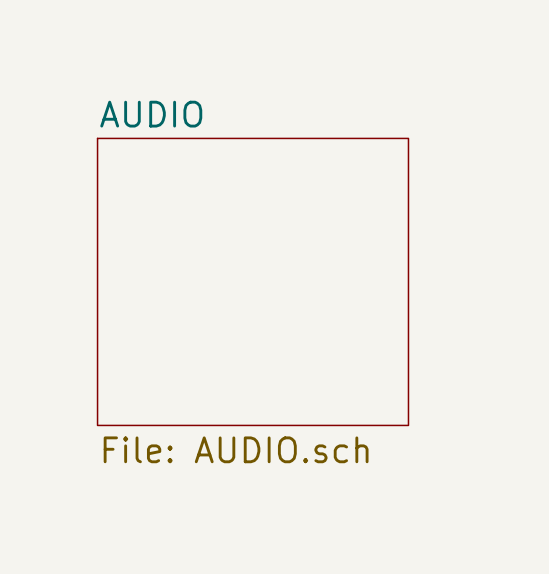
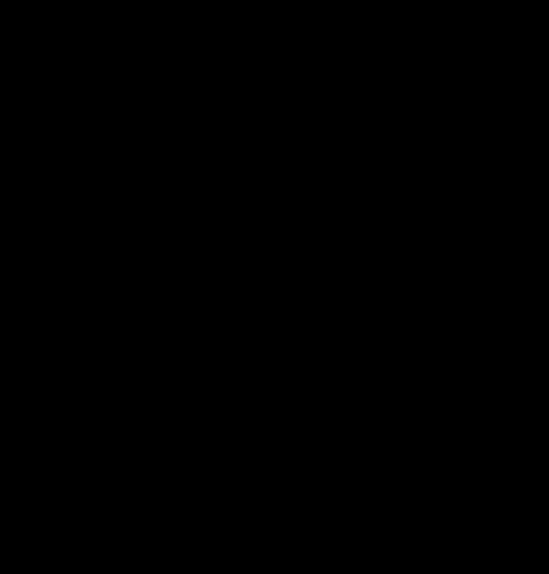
sheet AUDIO: File: AUDIO.sch (253, 281) -> none

